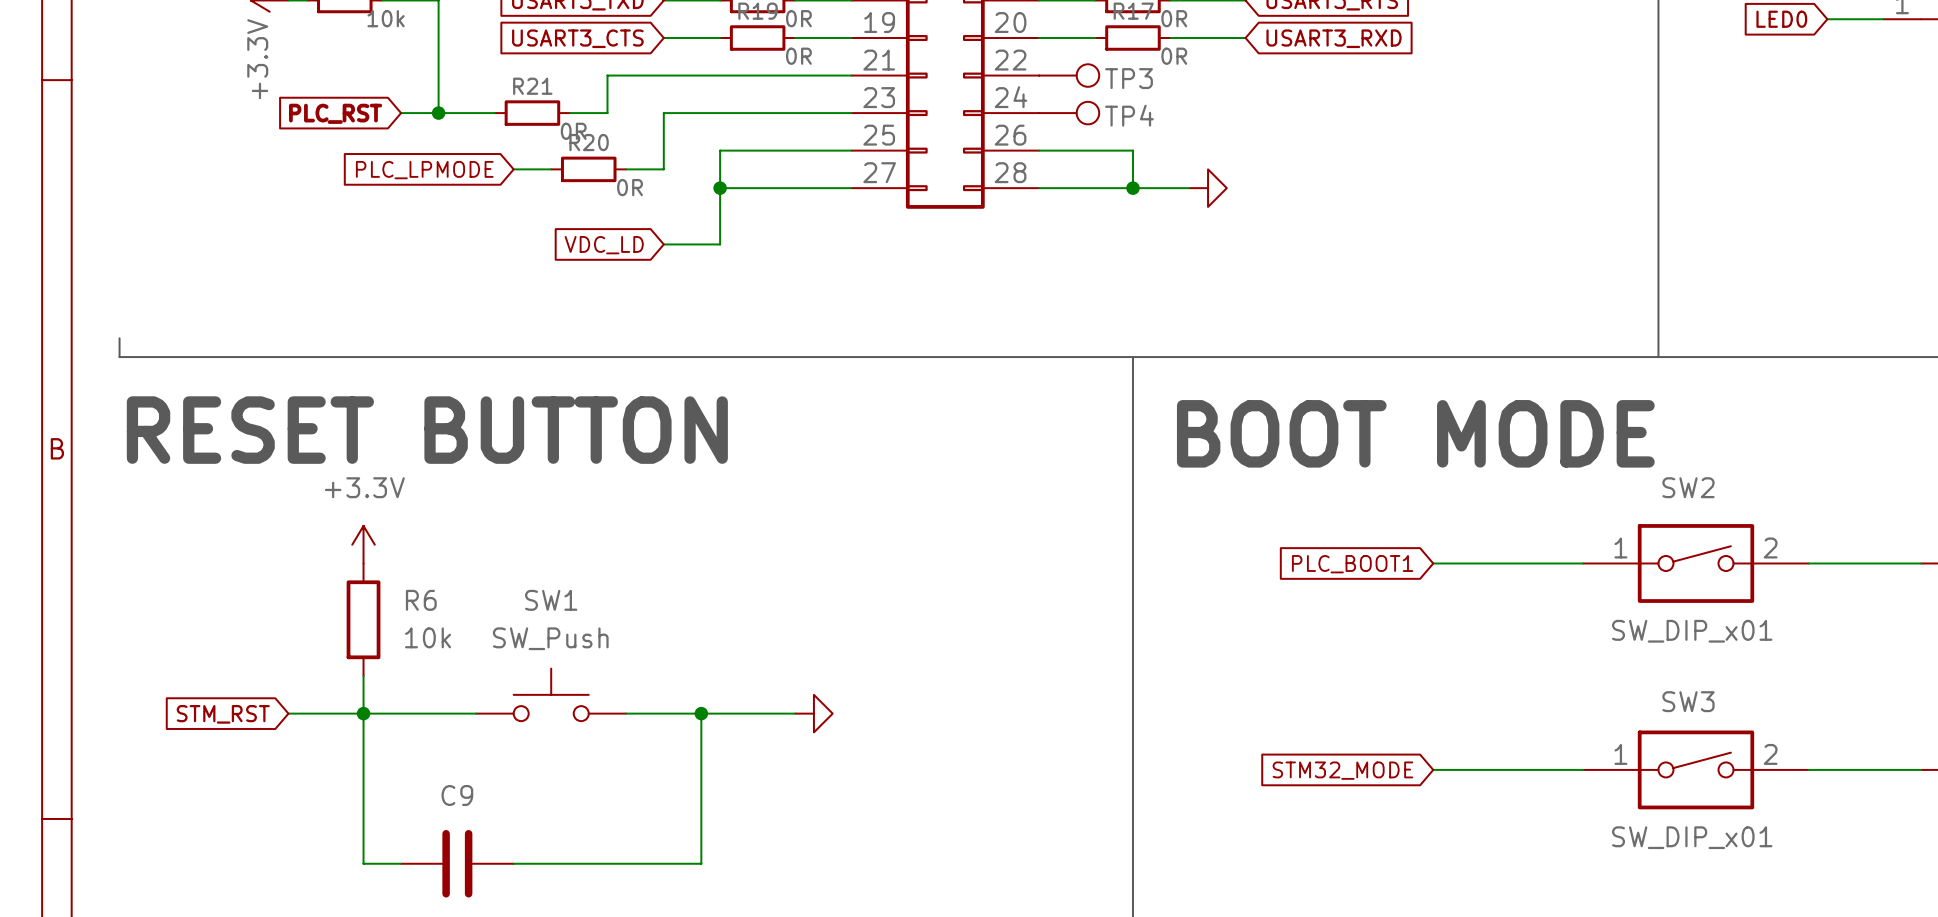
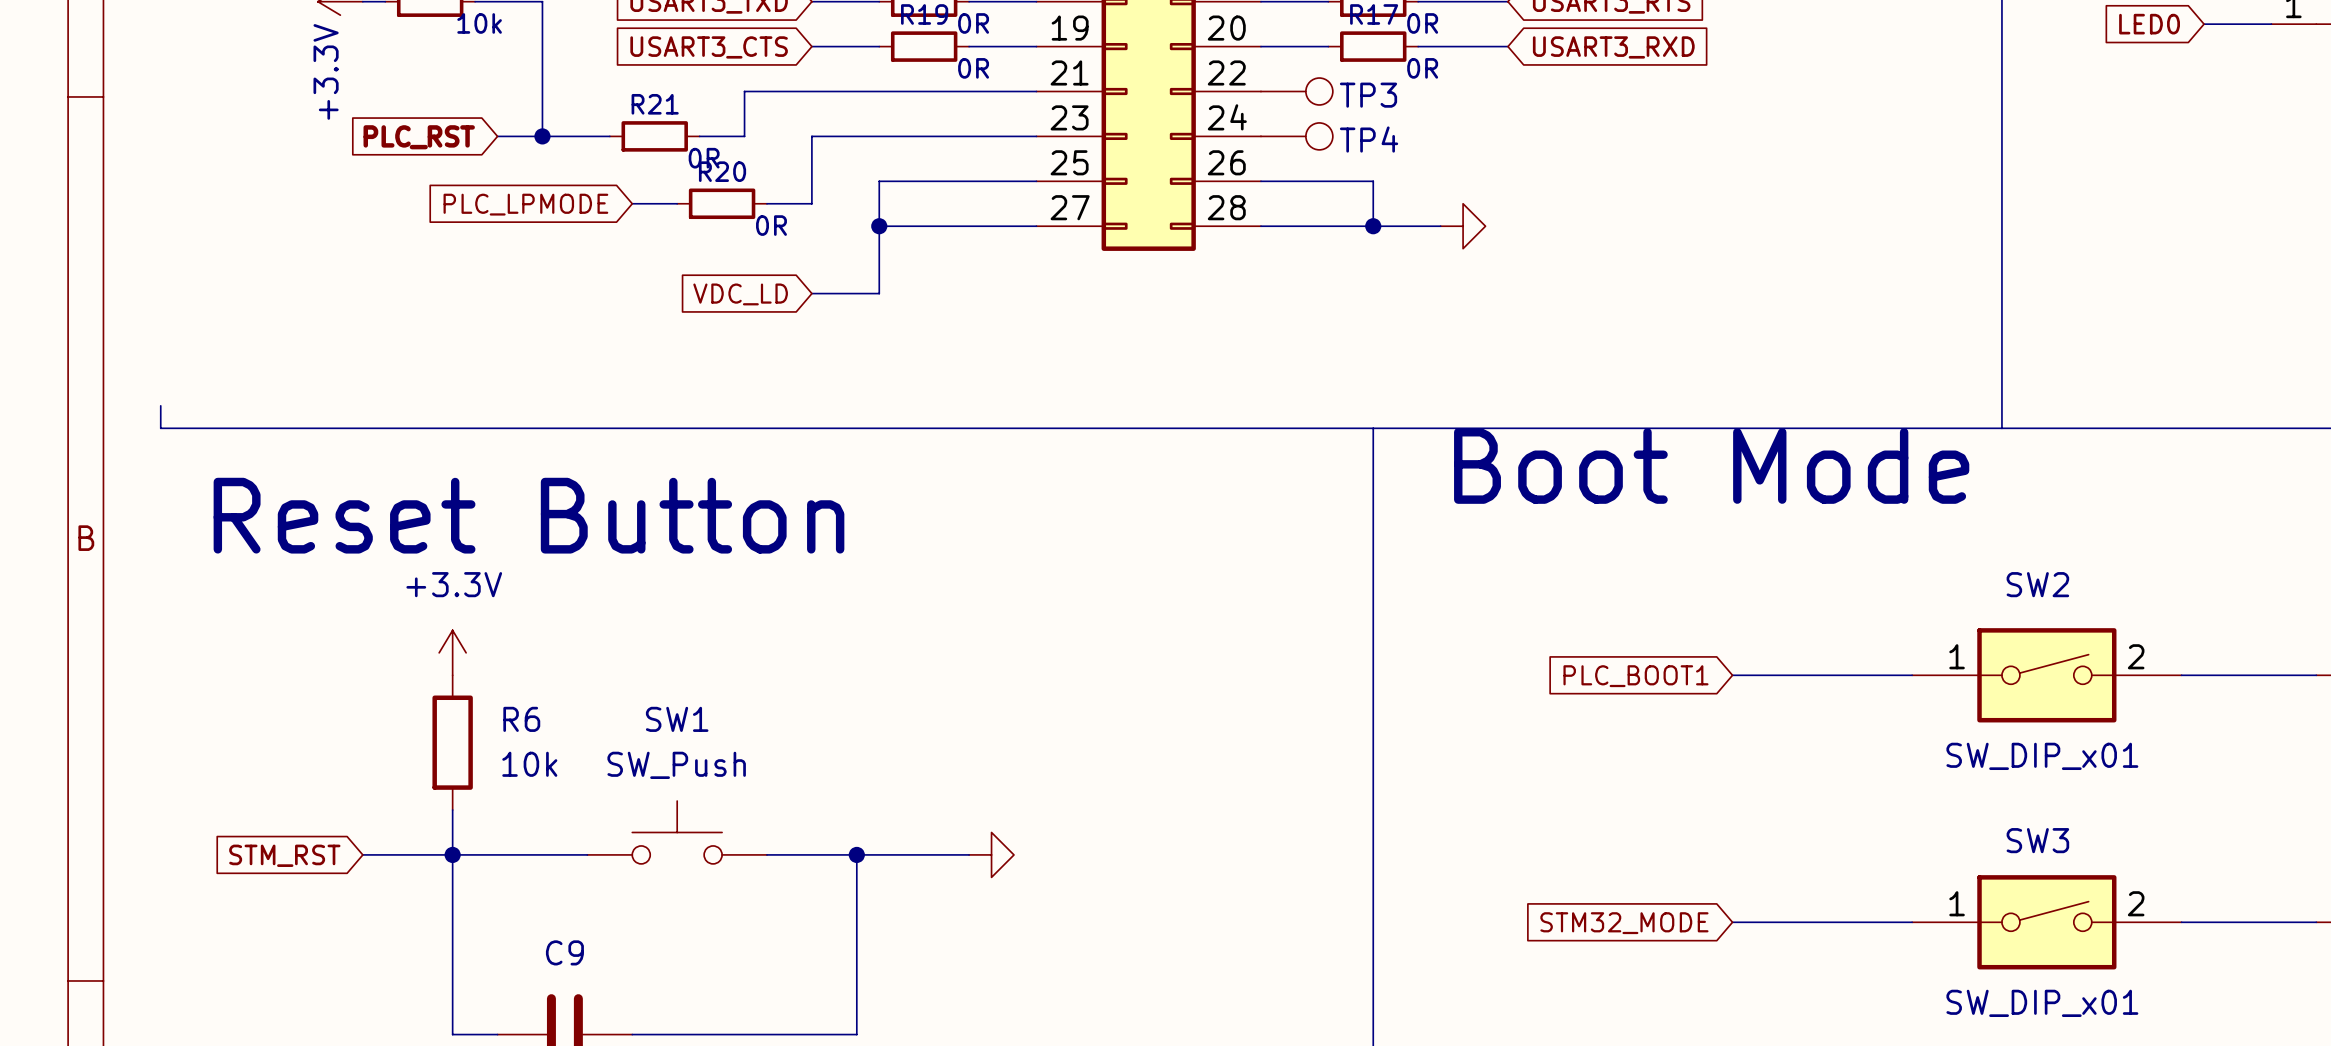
text: none -> Boot Mode (1711, 465)
text: RESET BUTTON (427, 430) -> Reset Button (528, 515)
text: BOOT MODE (1415, 433) -> none

